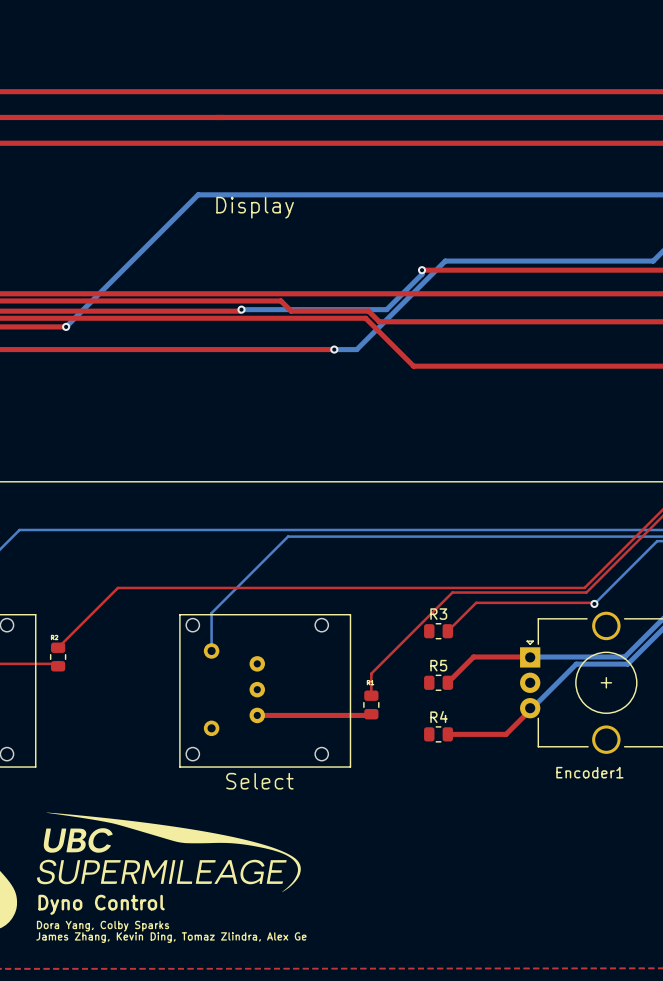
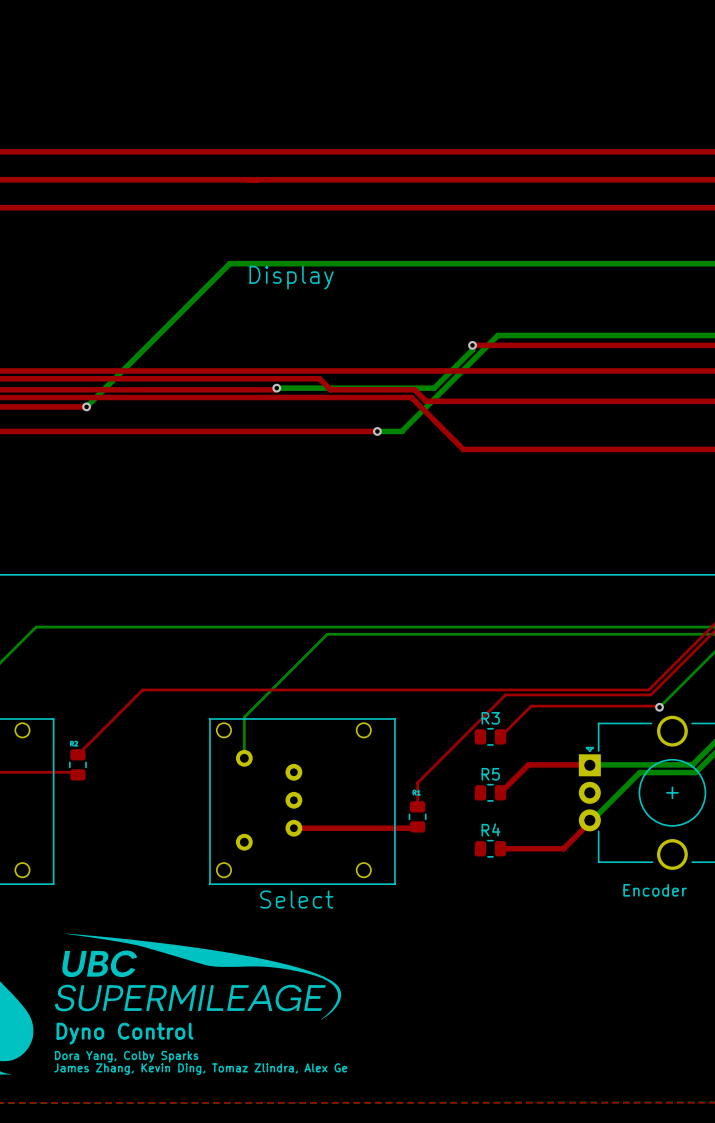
Encoder1 name: Encoder1 (589, 772) -> Encoder (655, 890)

